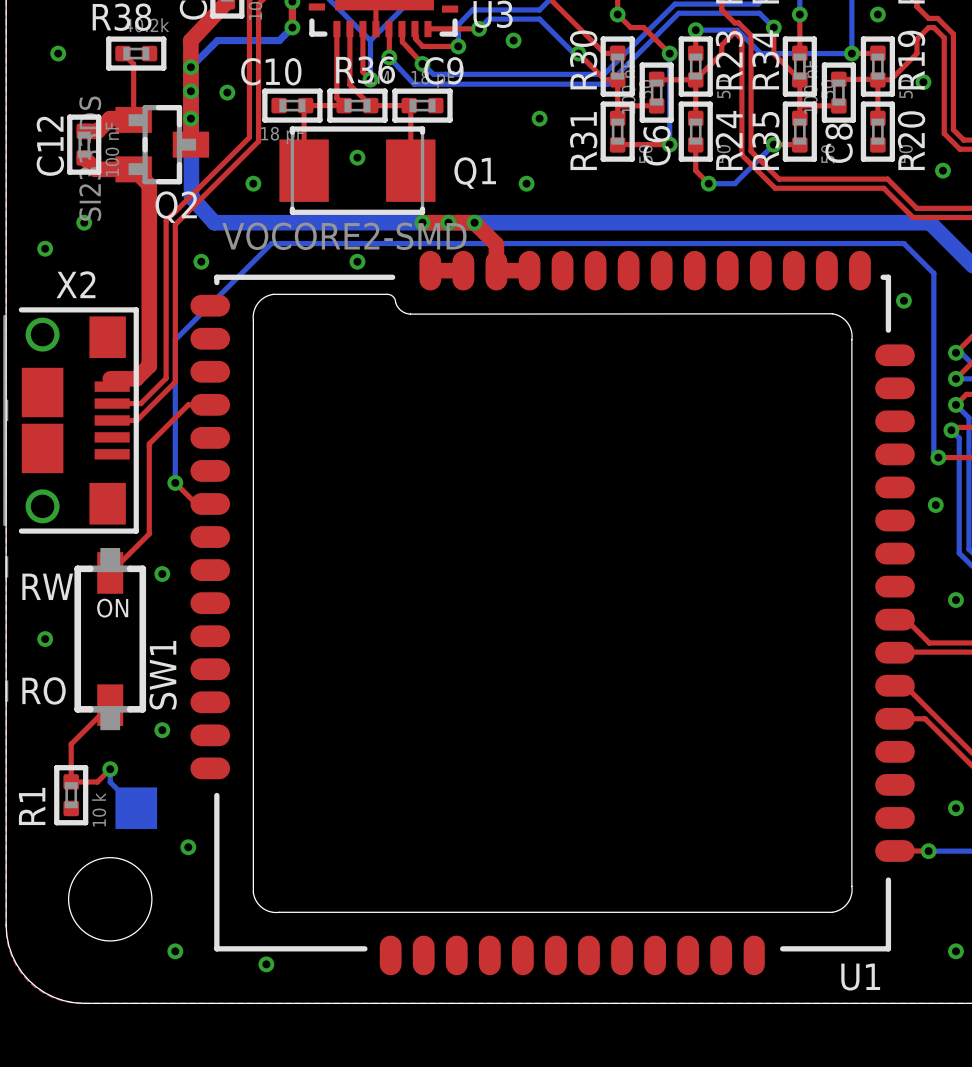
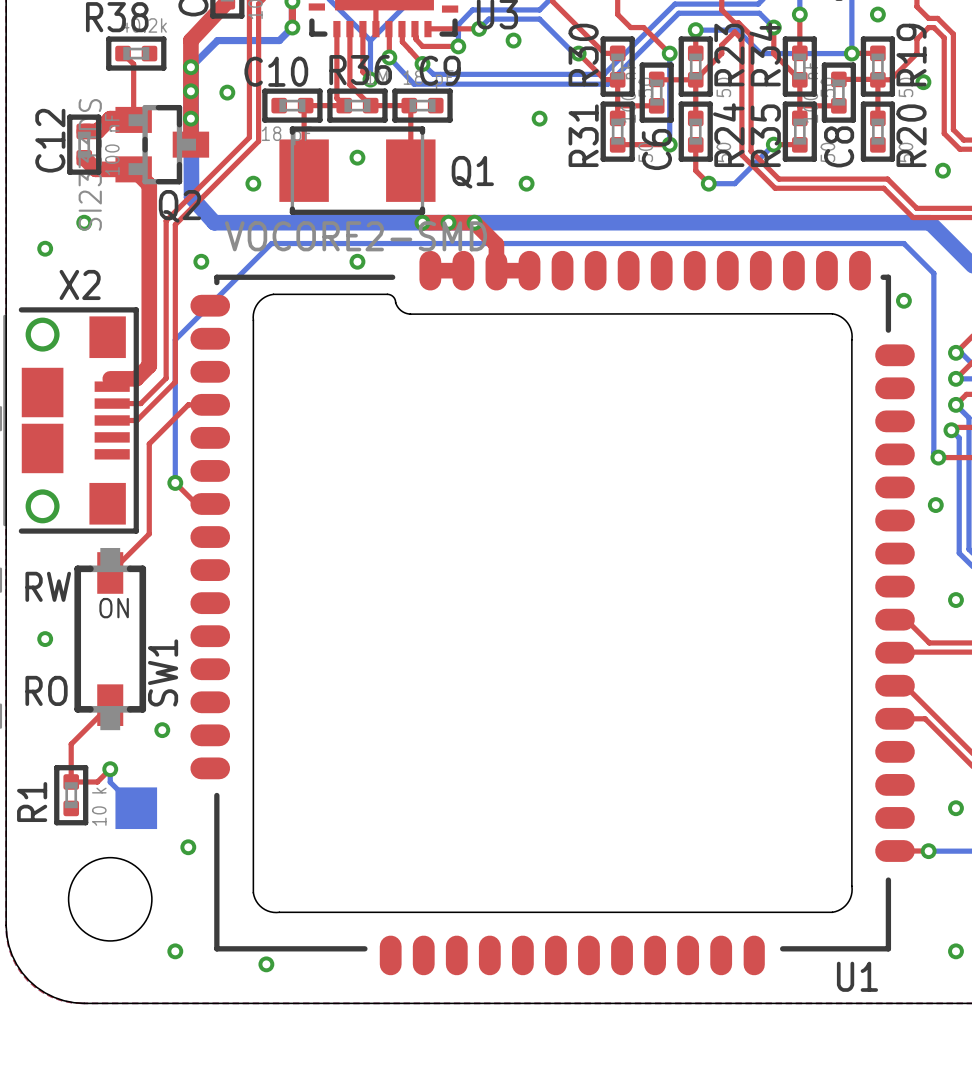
via: (617, 14) -> none
via: (58, 53) -> none
via: (162, 574) -> none

